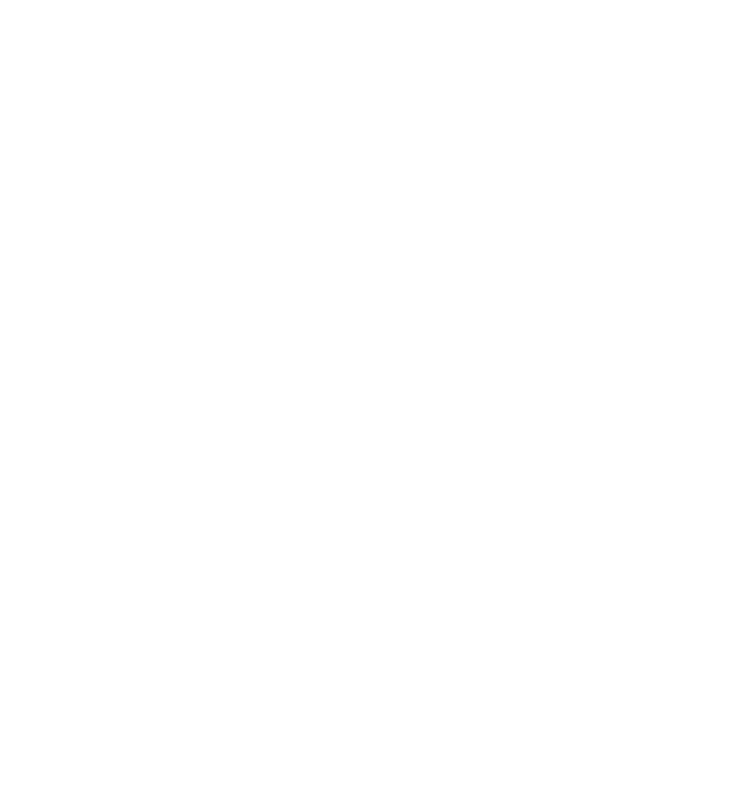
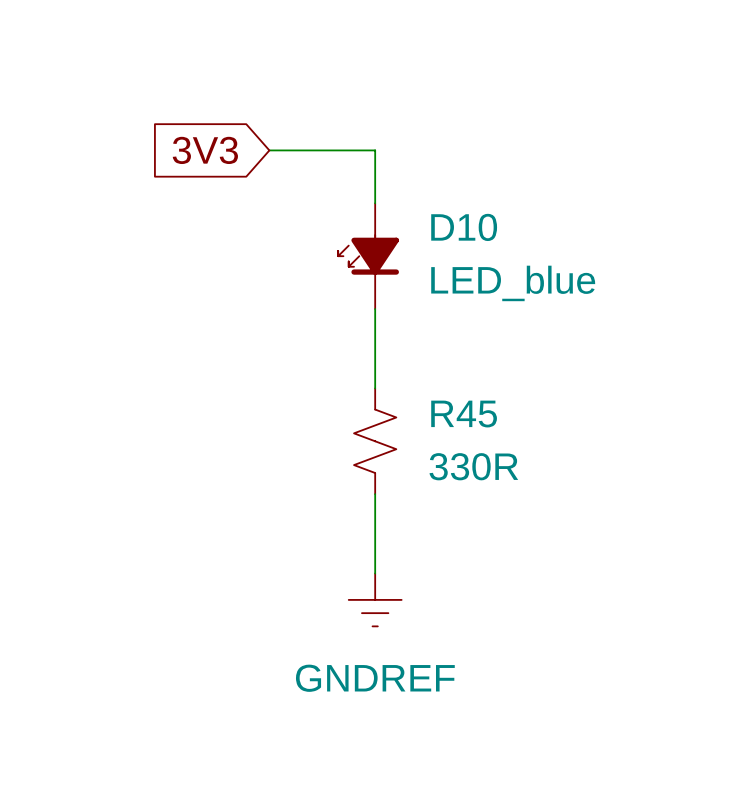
global label: none -> 3V3 (205, 150)
wire: none -> (269, 150) (375, 150) (375, 203)
D10: none -> LED_blue (368, 256)
wire: none -> (375, 309) (375, 388)
R45: none -> 330R (375, 441)
wire: none -> (375, 494) (375, 573)
power symbol: none -> GNDREF (375, 599)

